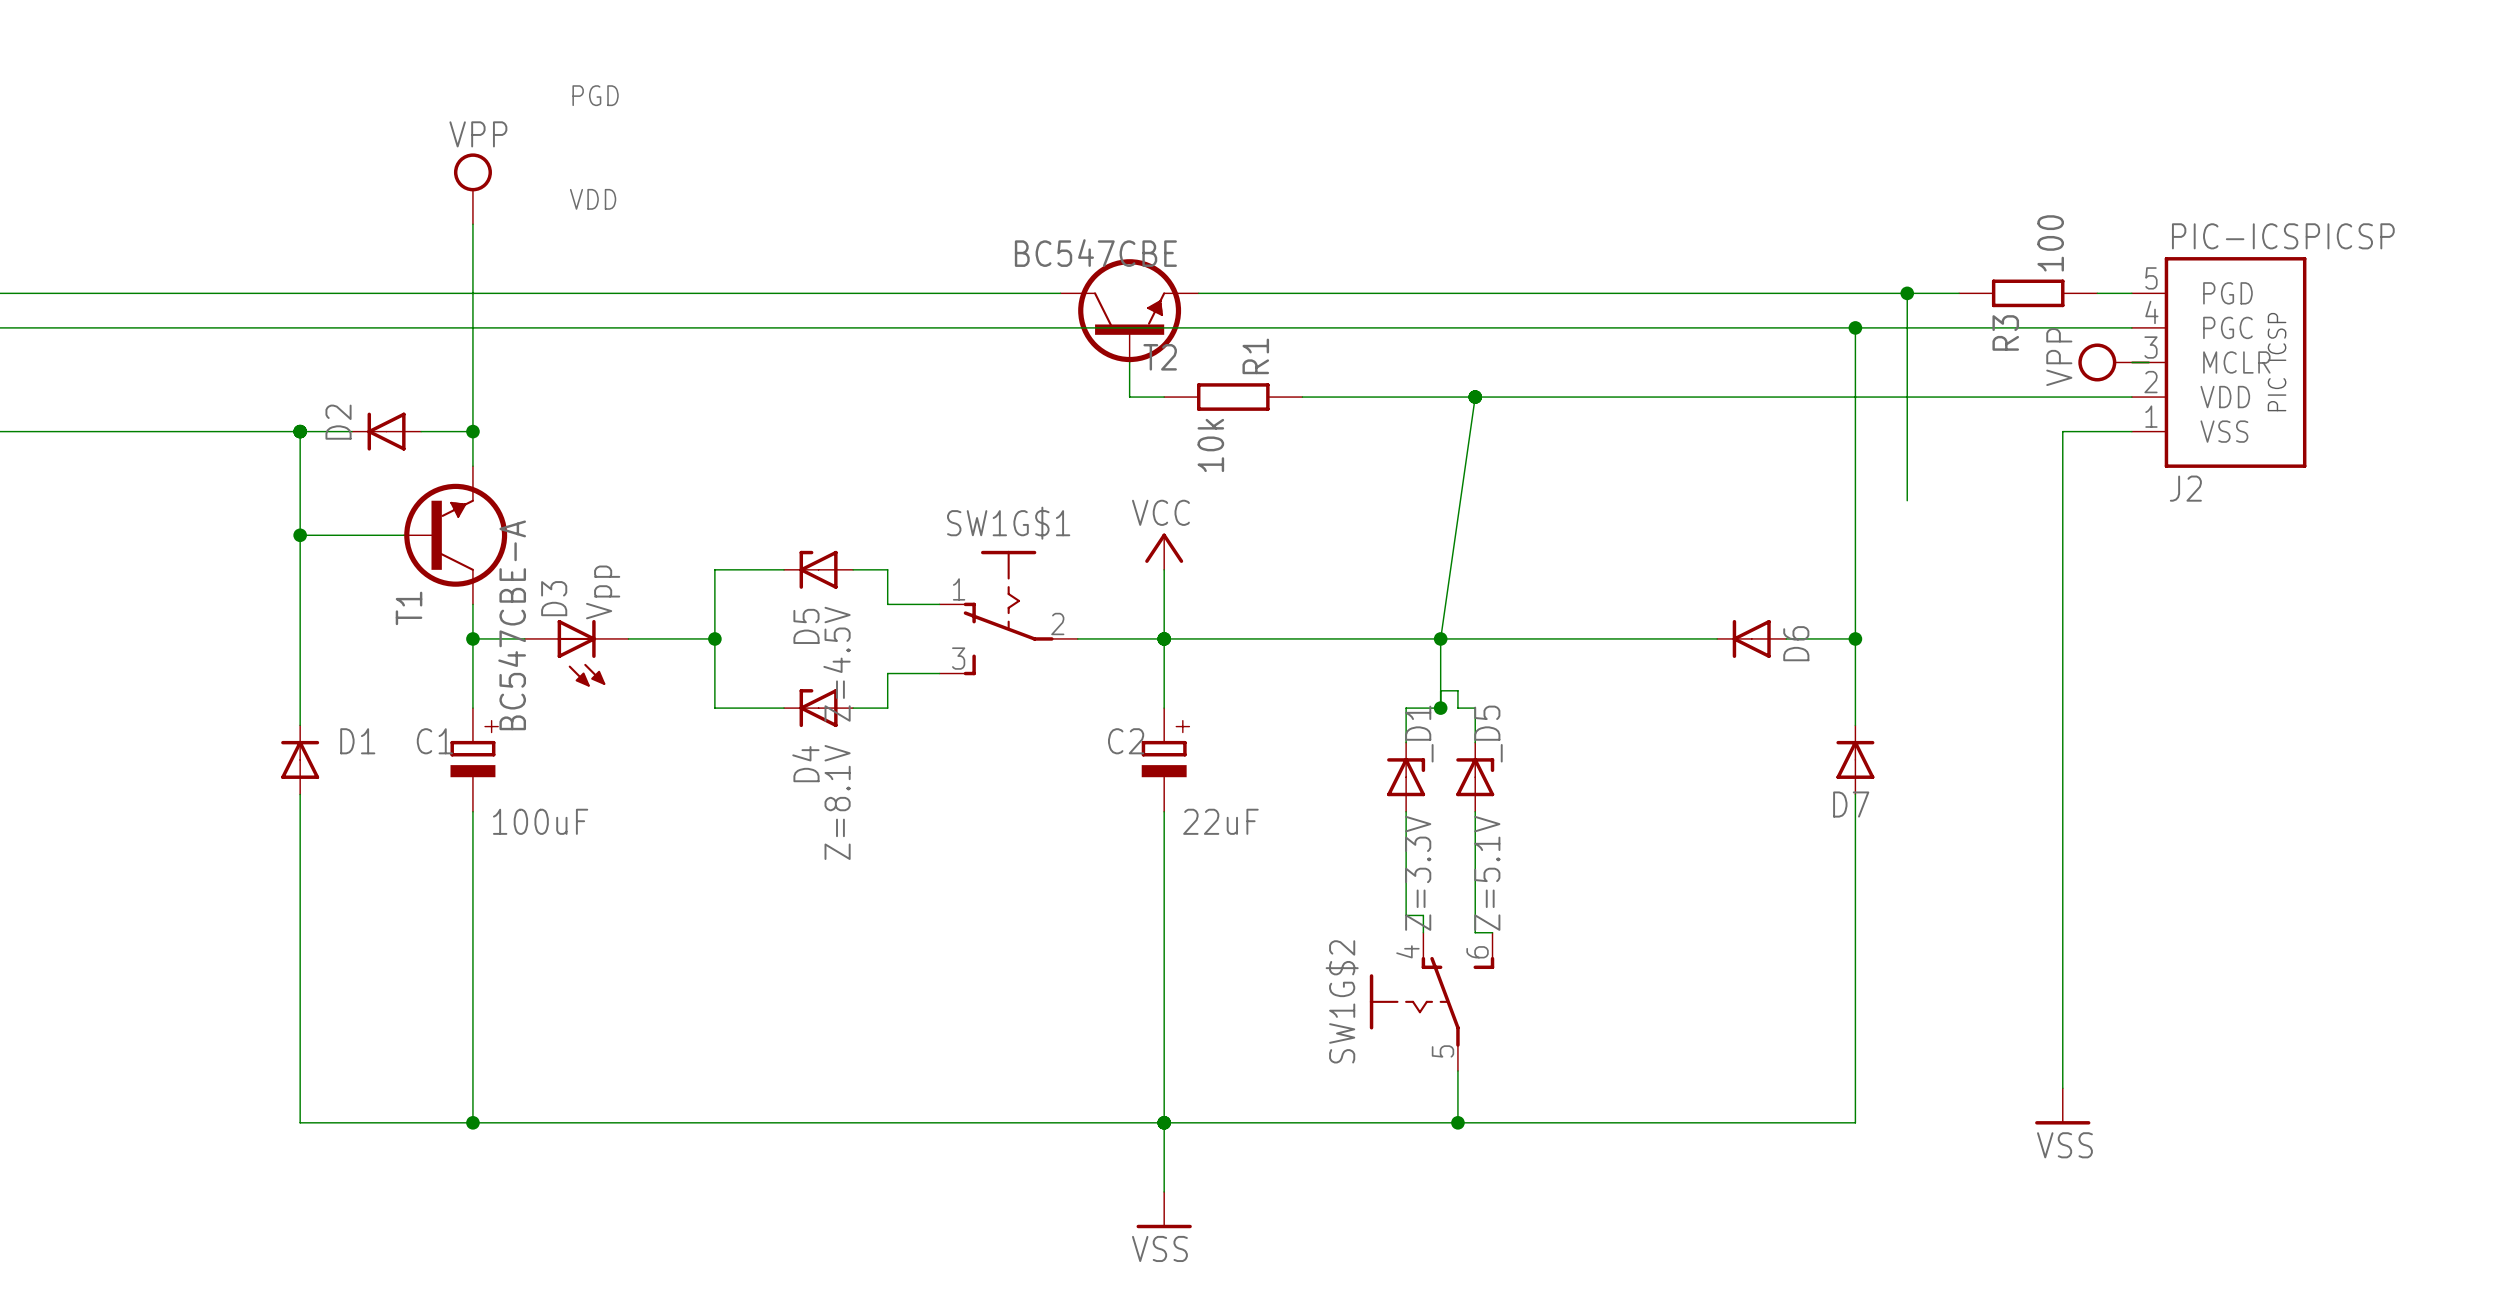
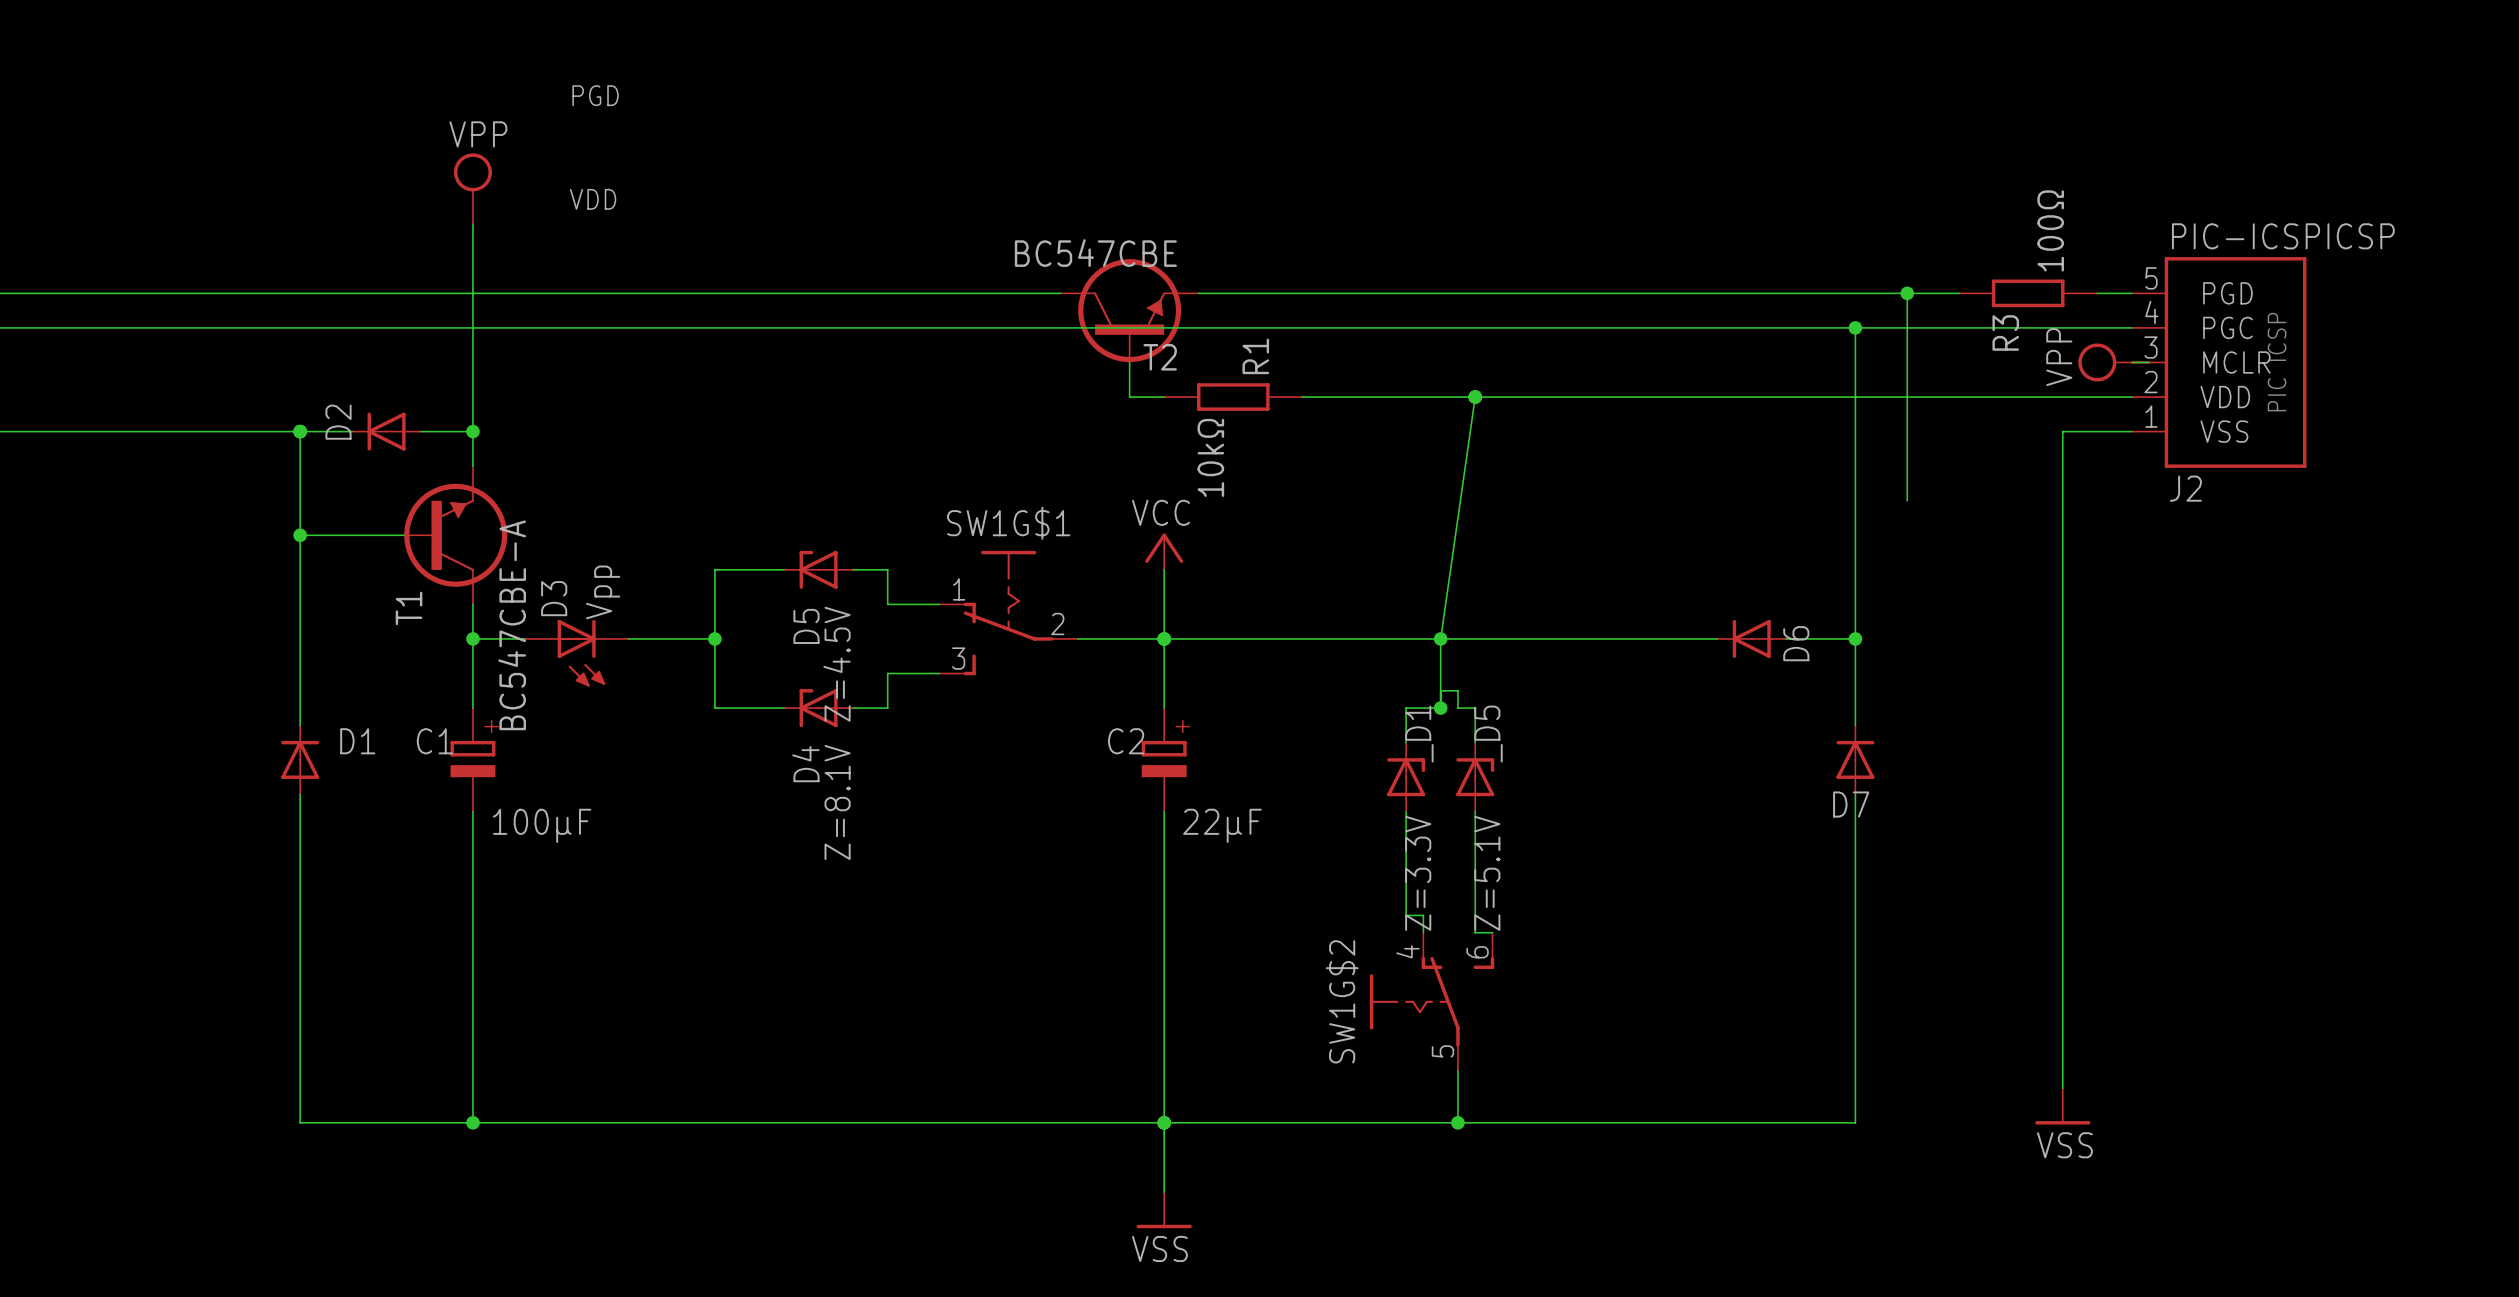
R3 value: 100 (2050, 243) -> 100Ω (2050, 230)
R1 value: 10k (1210, 445) -> 10kΩ (1210, 457)
C1 value: 100uF (540, 821) -> 100μF (542, 825)
C2 value: 22uF (1220, 821) -> 22μF (1222, 825)

